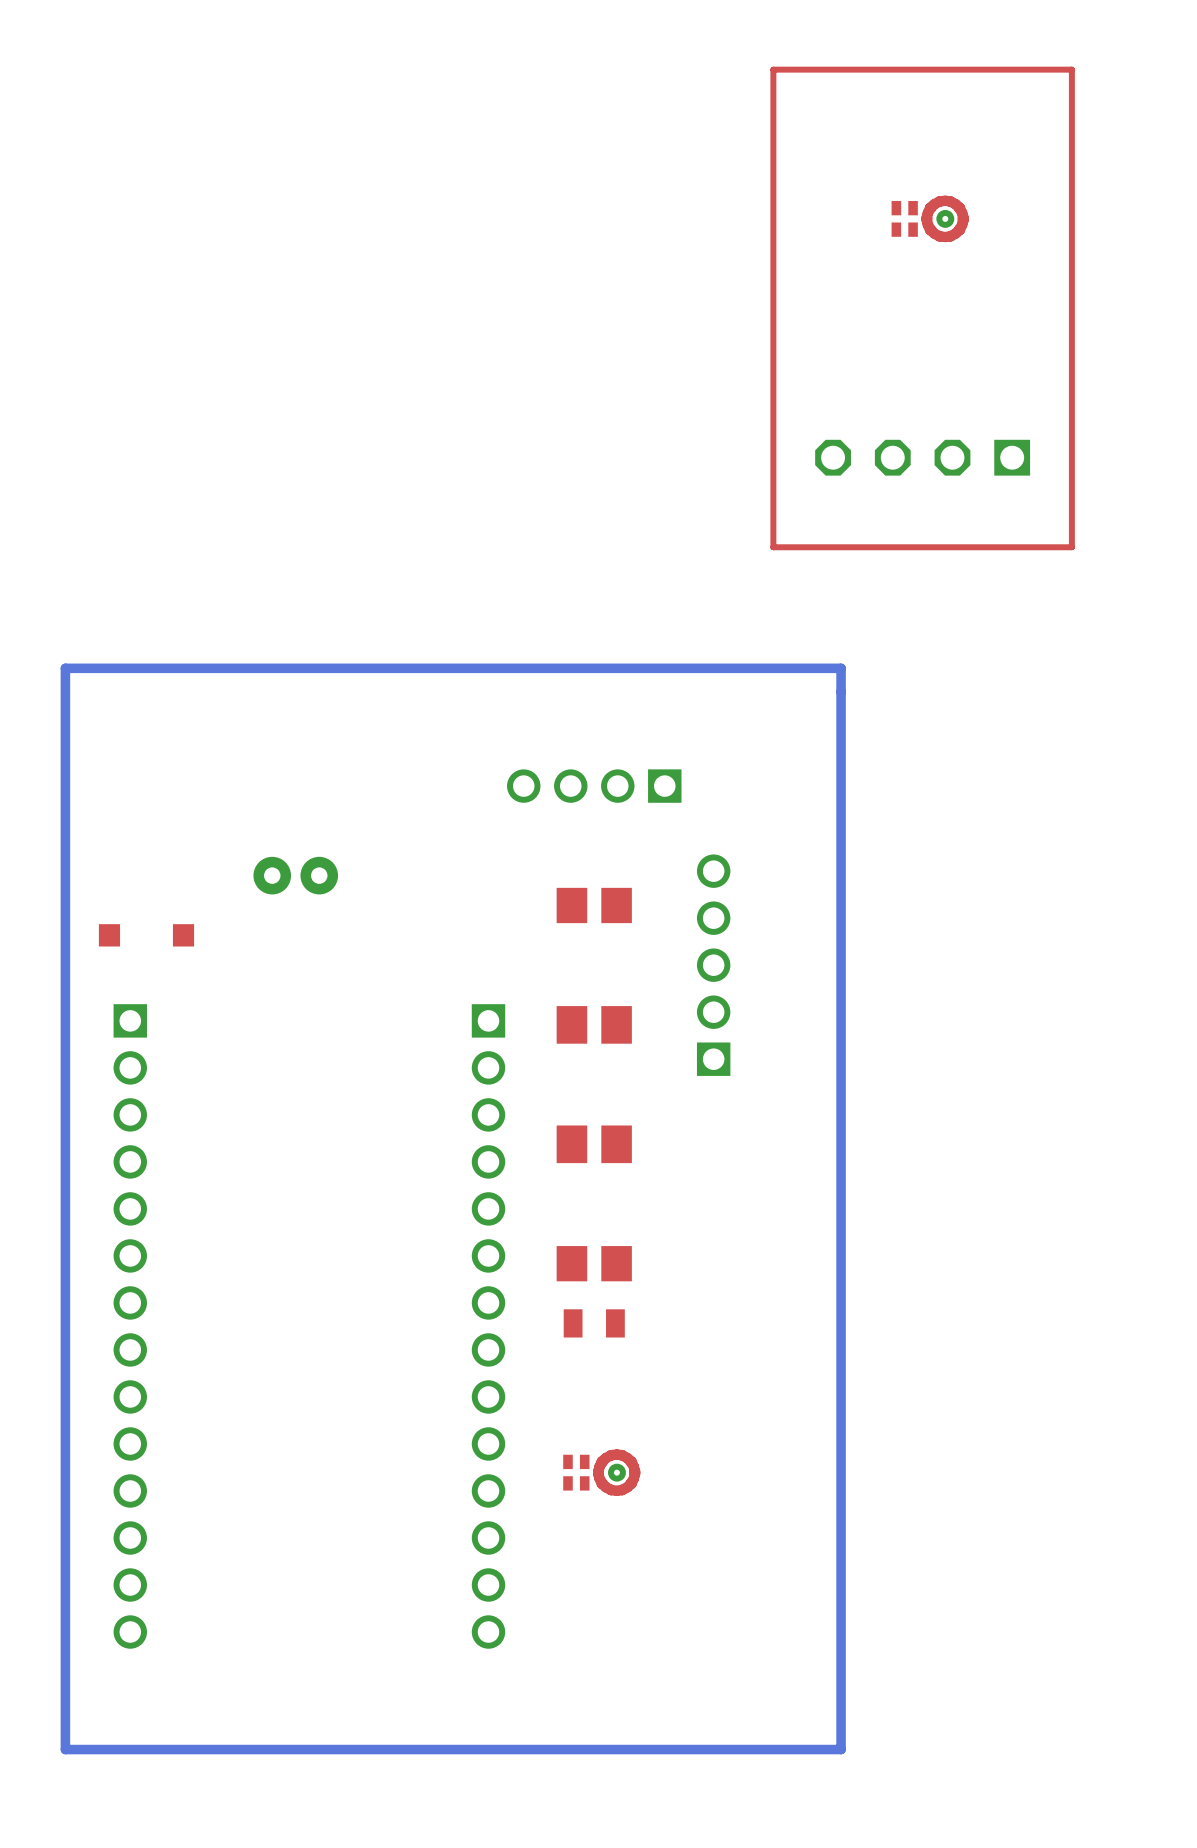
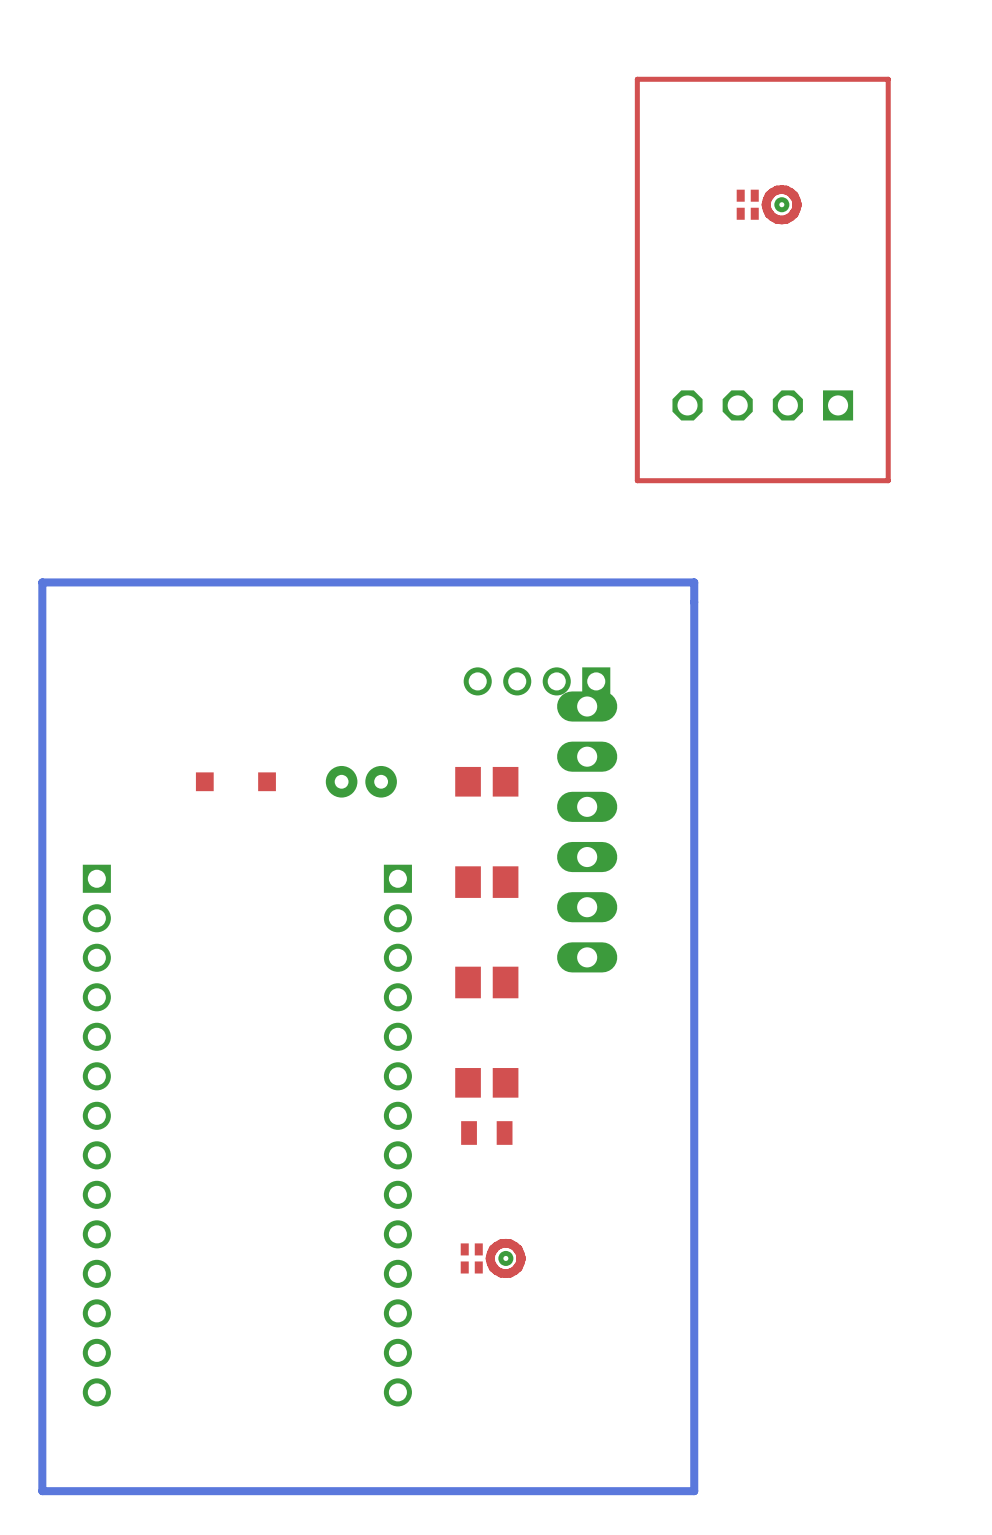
part position: (594, 786) -> (536, 681)
part footprint: [696, 854, 731, 1076] -> [557, 691, 618, 973]
part position: (295, 875) -> (361, 781)
part position: (146, 935) -> (235, 781)

